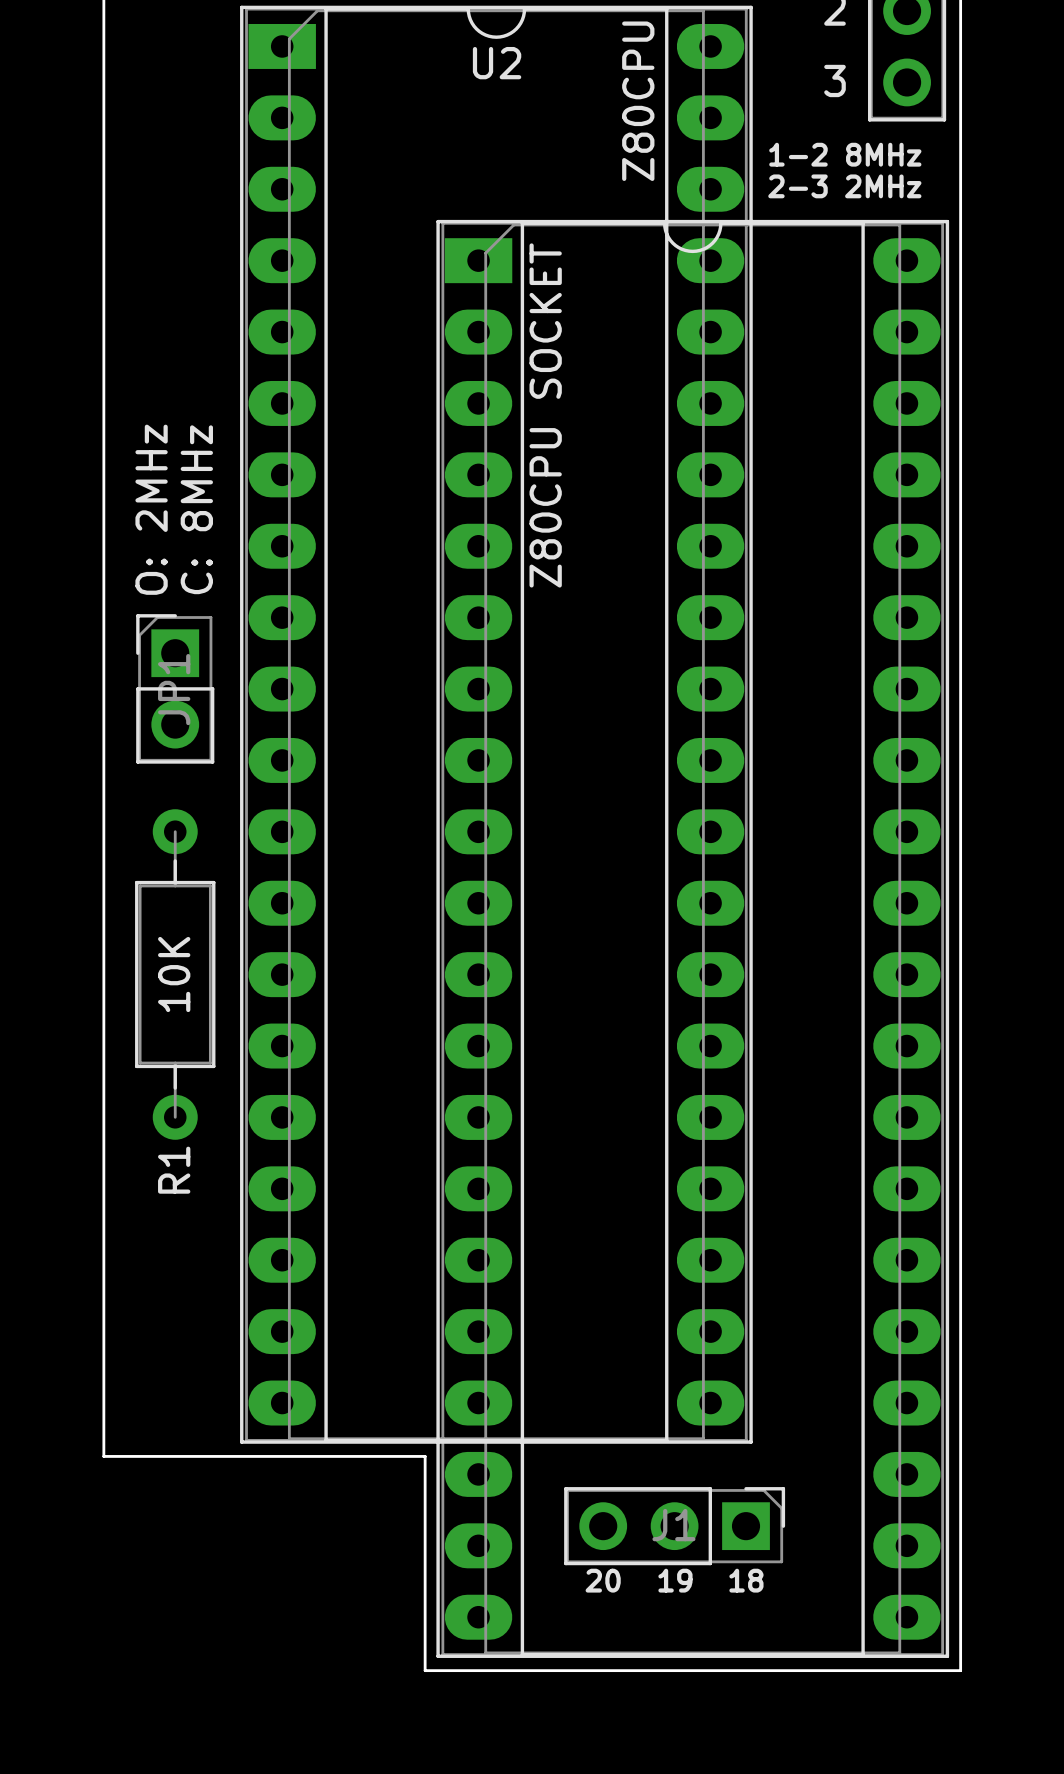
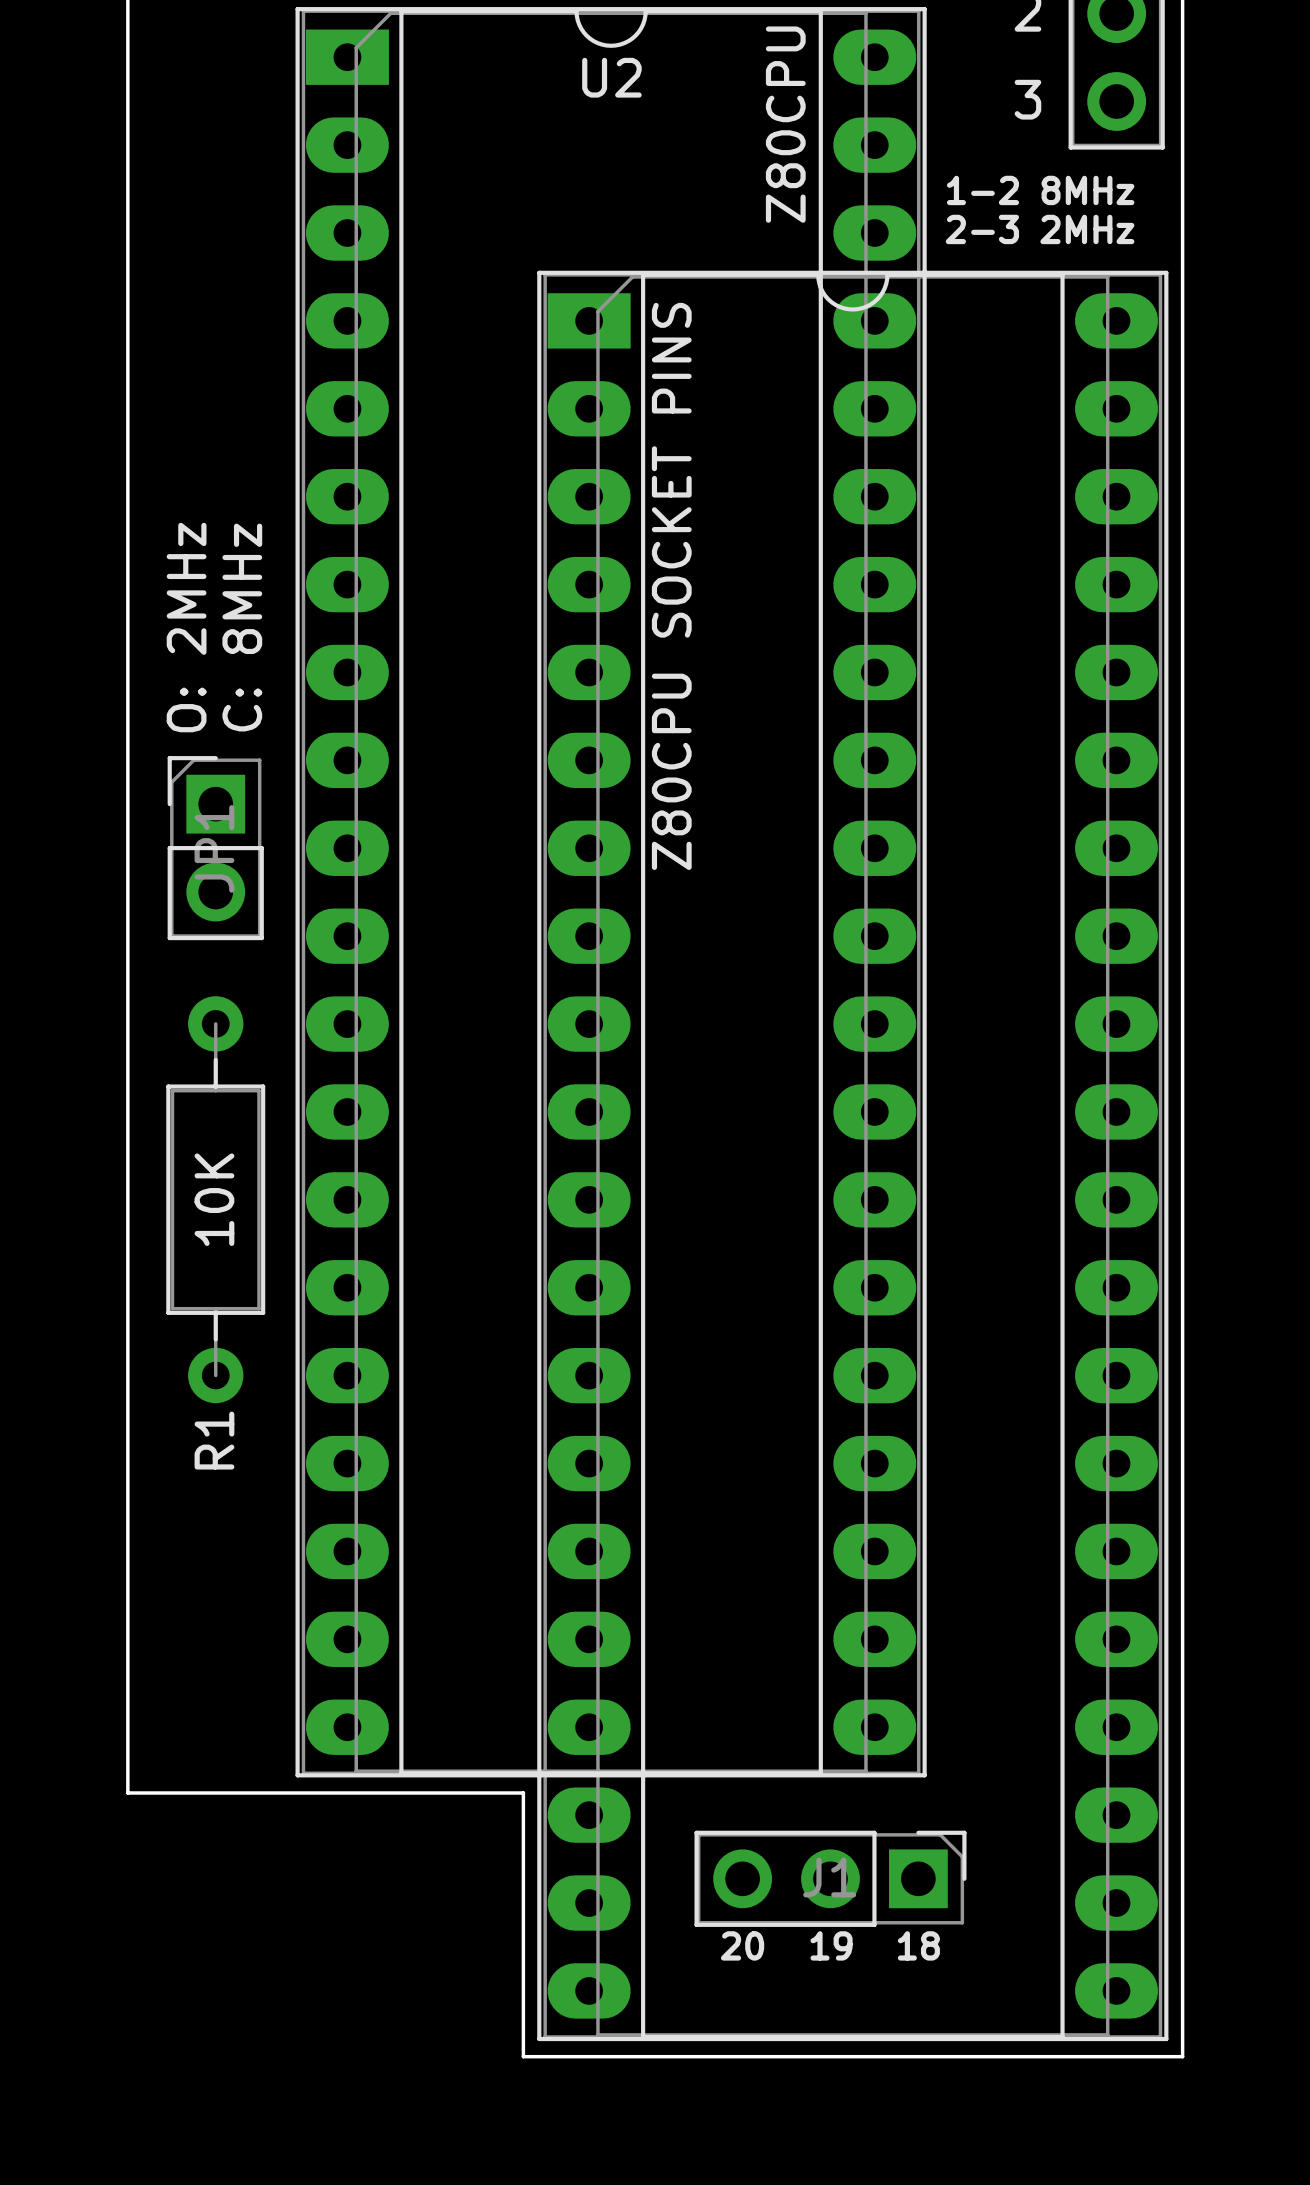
part value: Z80CPU SOCKET (545, 415) -> Z80CPU SOCKET PINS (671, 586)

